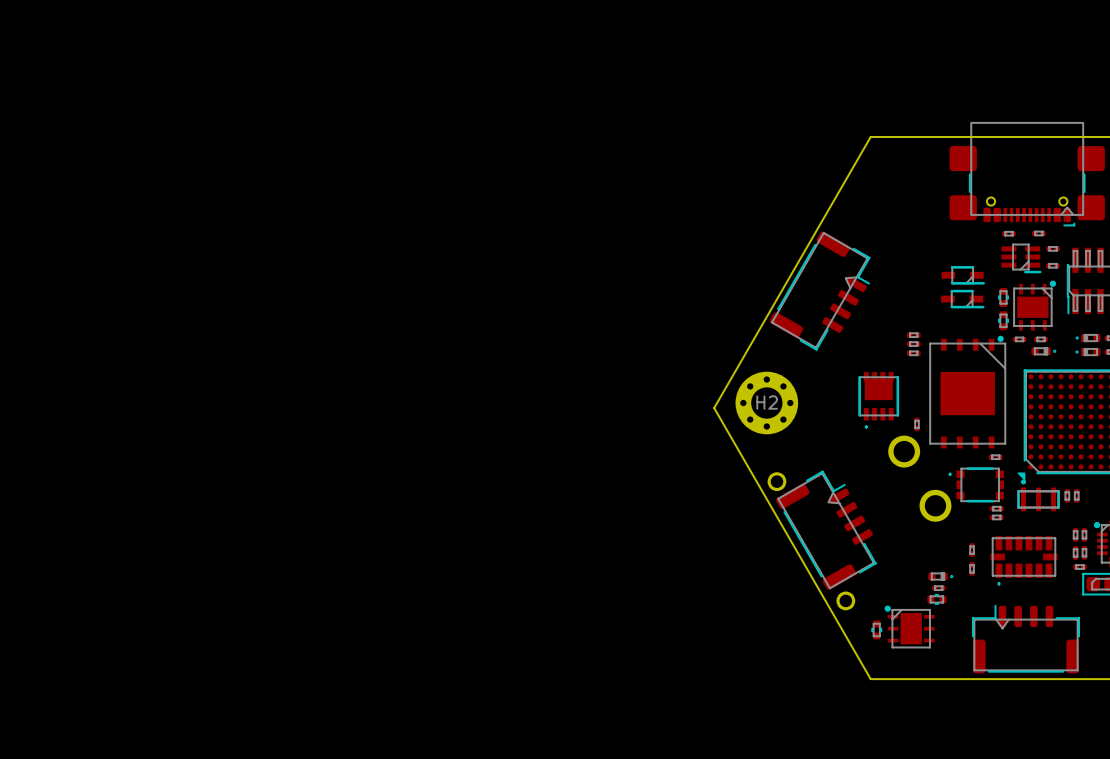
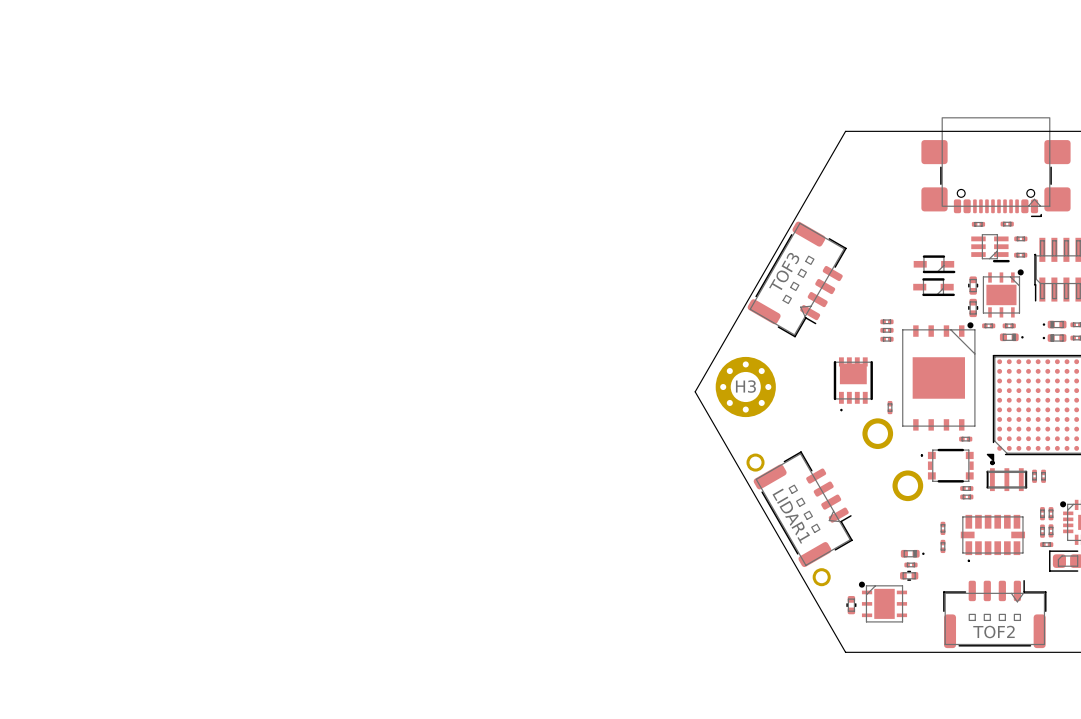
part: (820, 290) -> none
TOF3: none -> (797, 279)
H2 name: H2 (767, 402) -> H3 (745, 386)
part: (826, 530) -> none
LIDAR1: none -> (803, 509)
part: (1026, 639) -> none
TOF2: none -> (994, 614)

